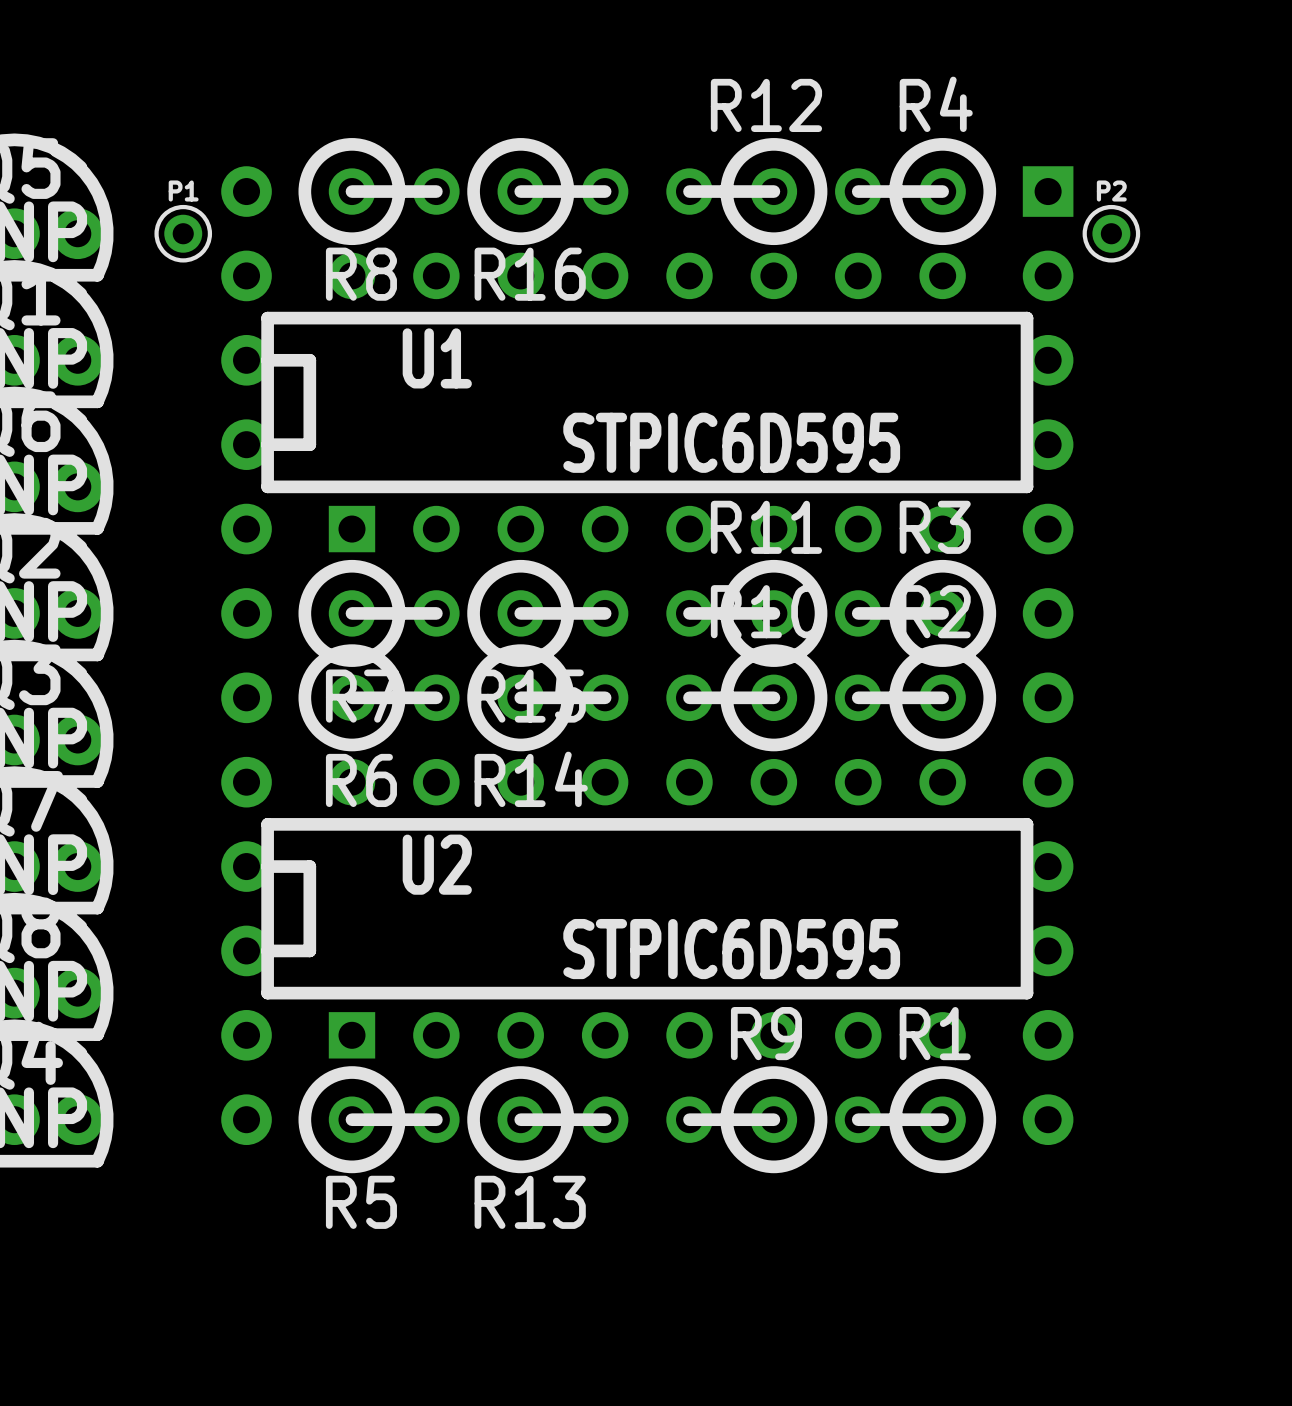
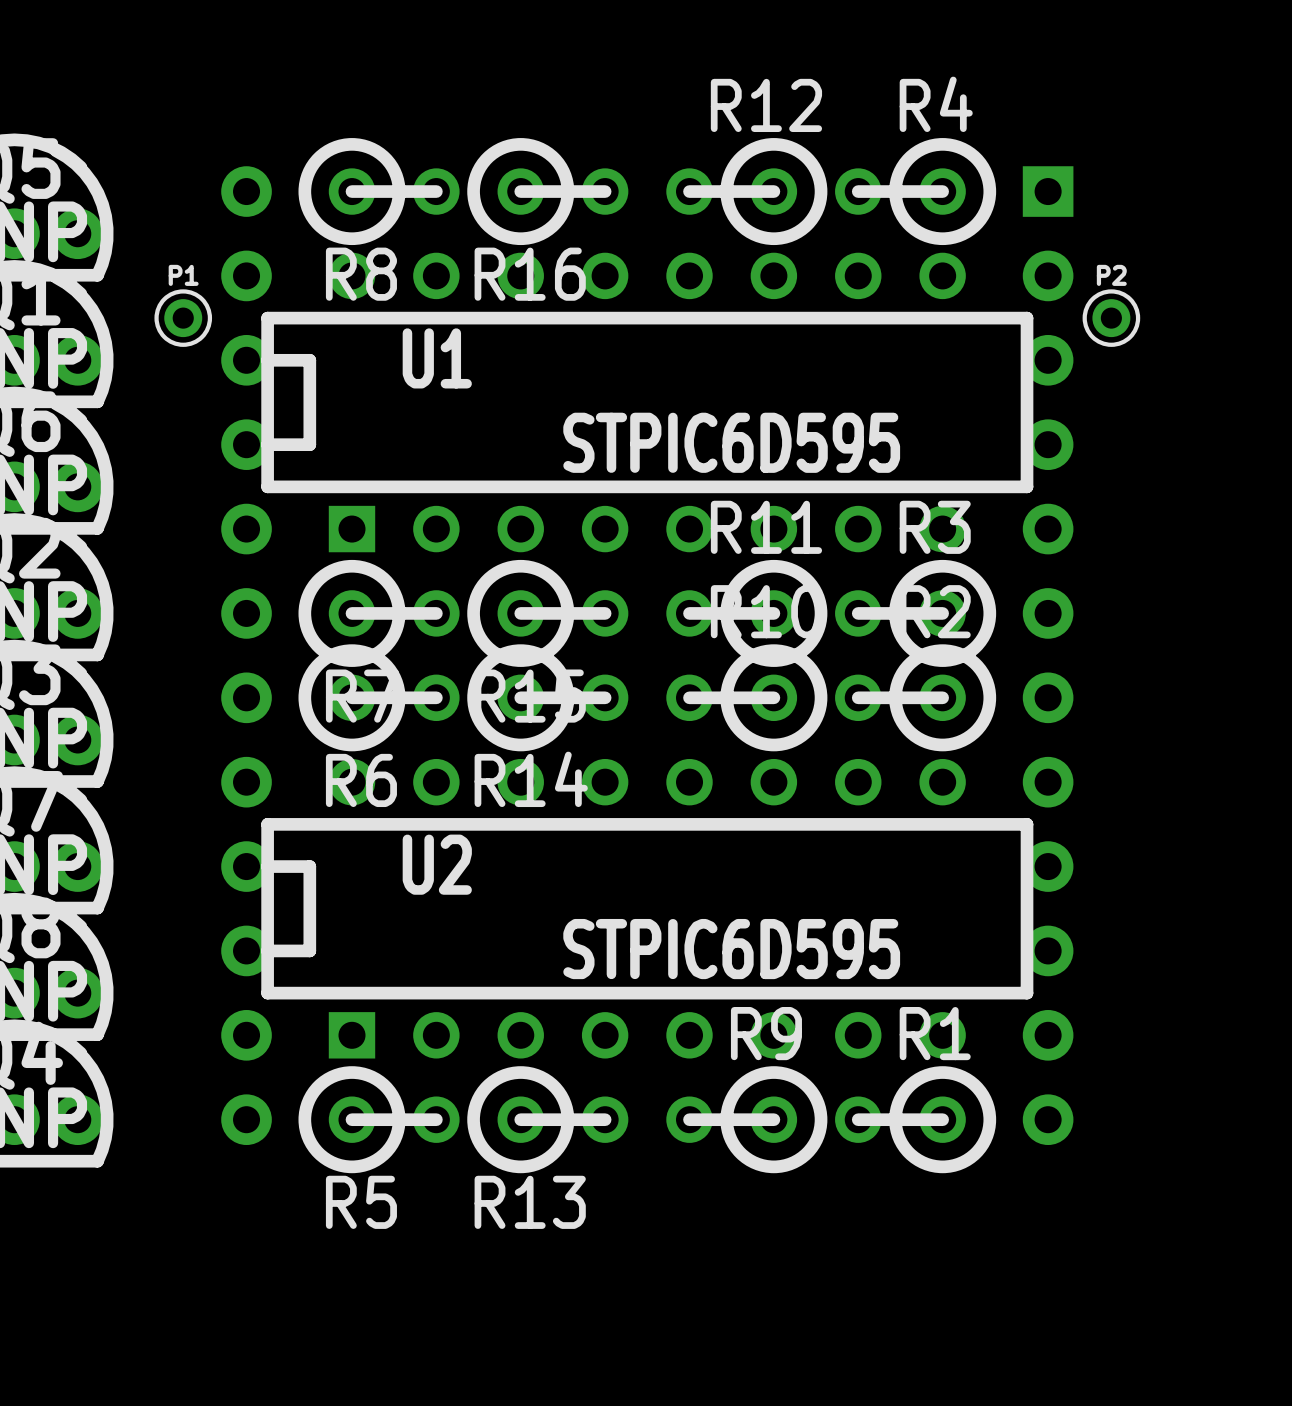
P1 position: (183, 233) -> (183, 318)
P2 position: (1111, 233) -> (1111, 318)

